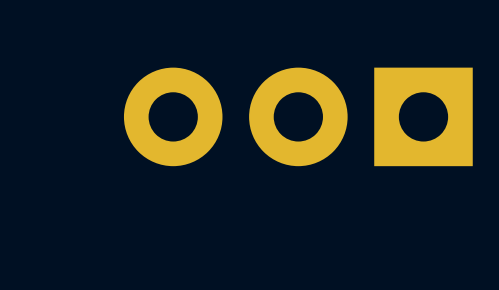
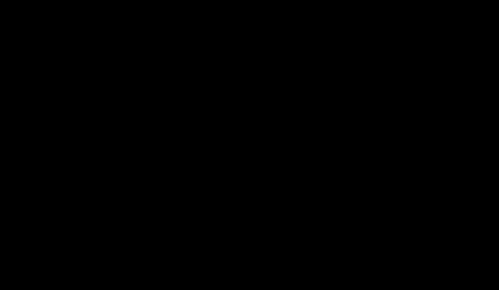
part: (298, 116) -> none

